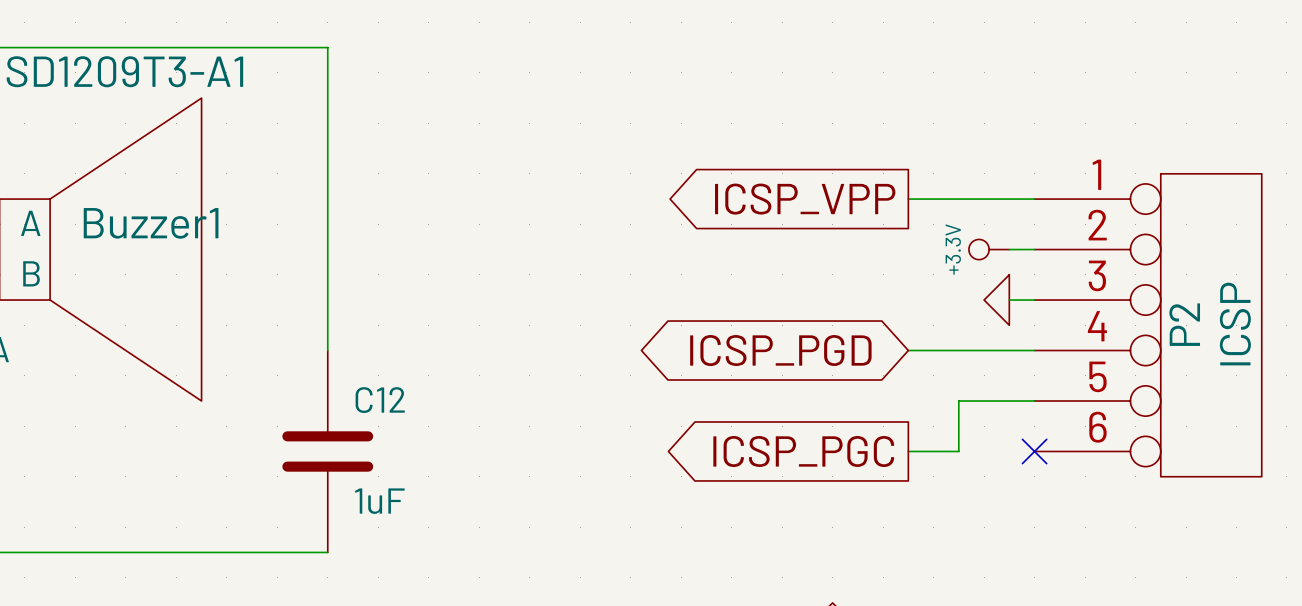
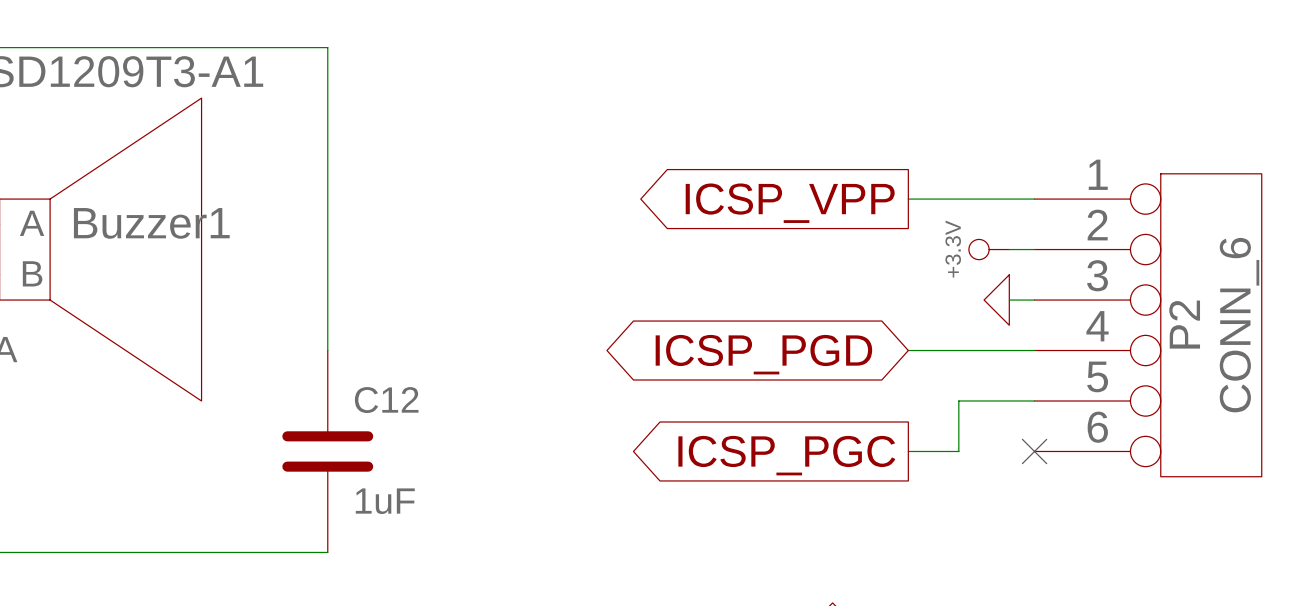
P2 value: ICSP (1235, 324) -> CONN_6 (1239, 325)

